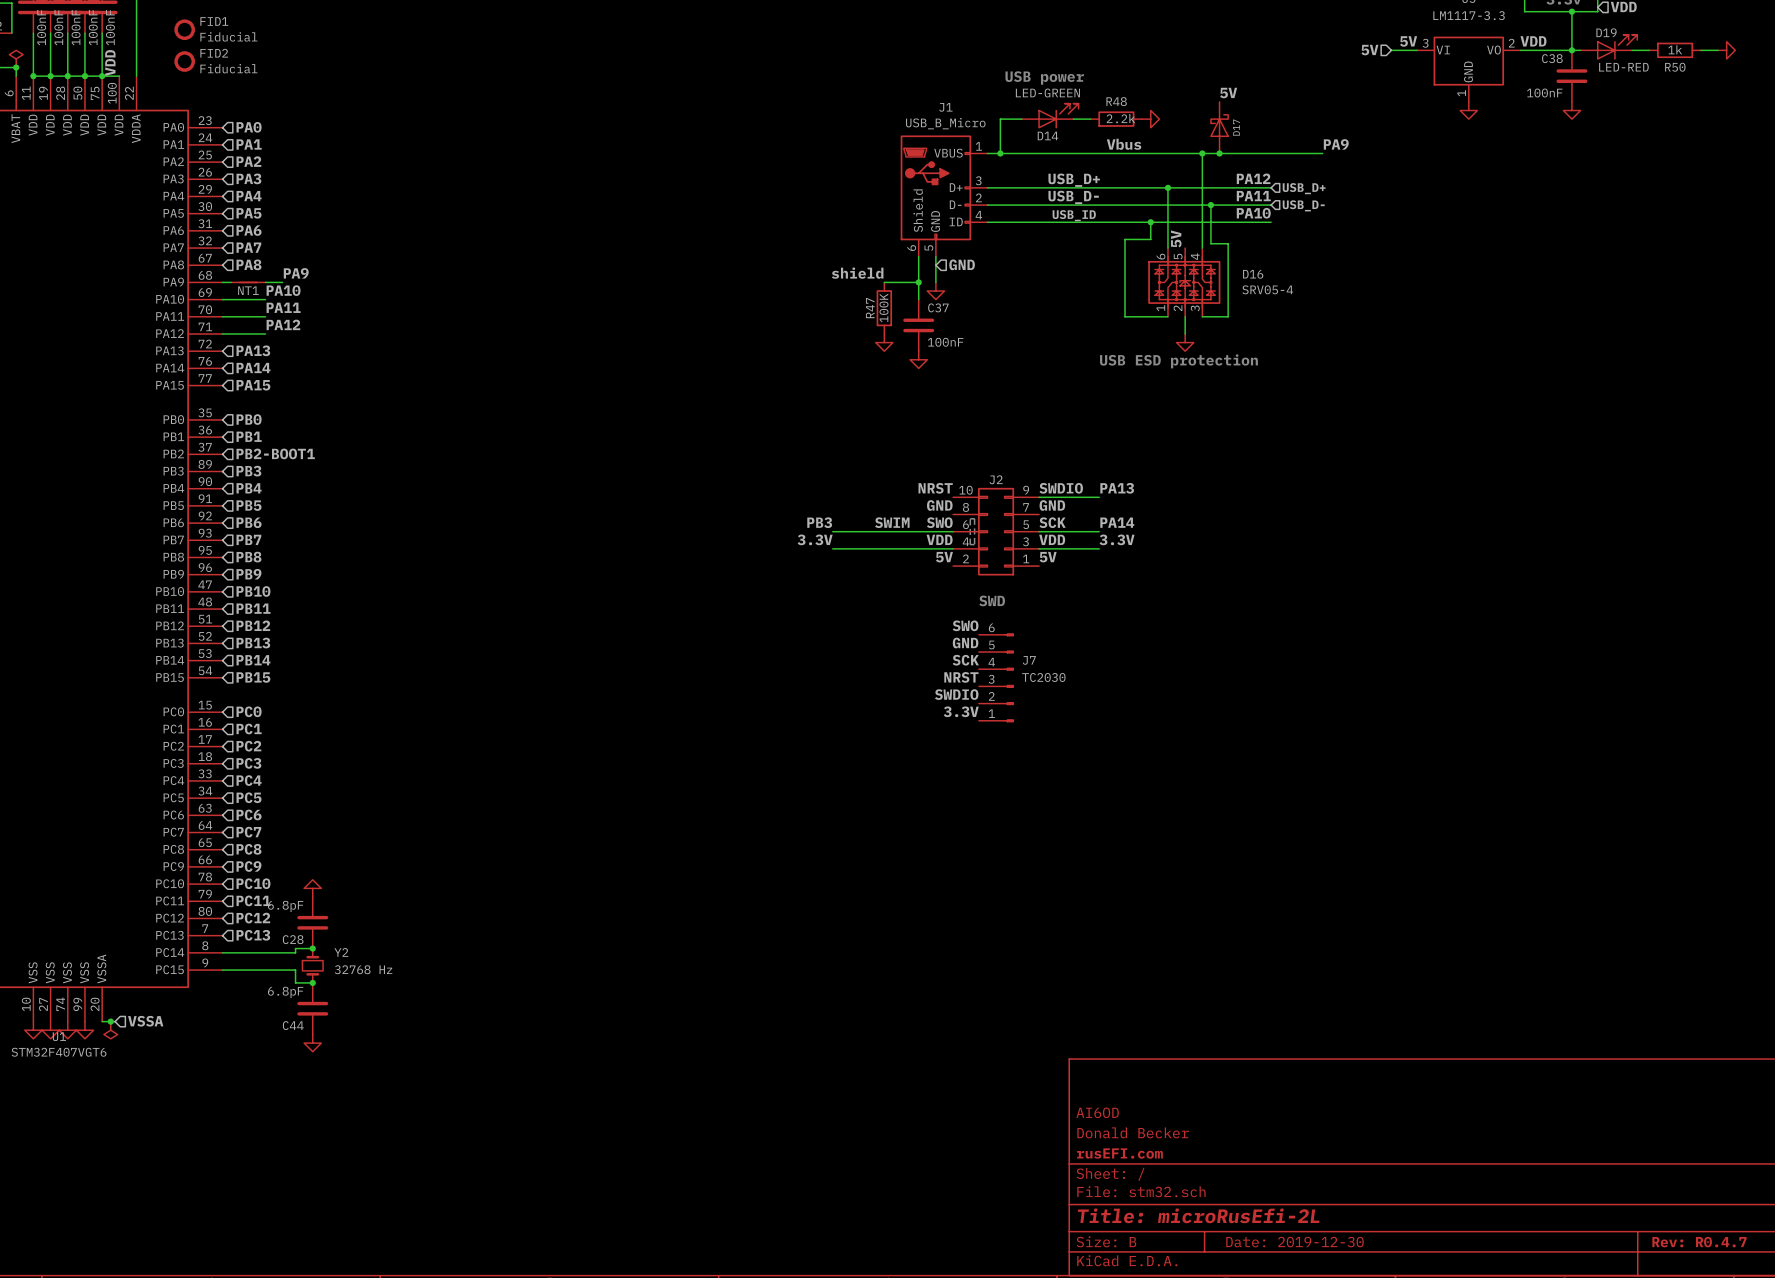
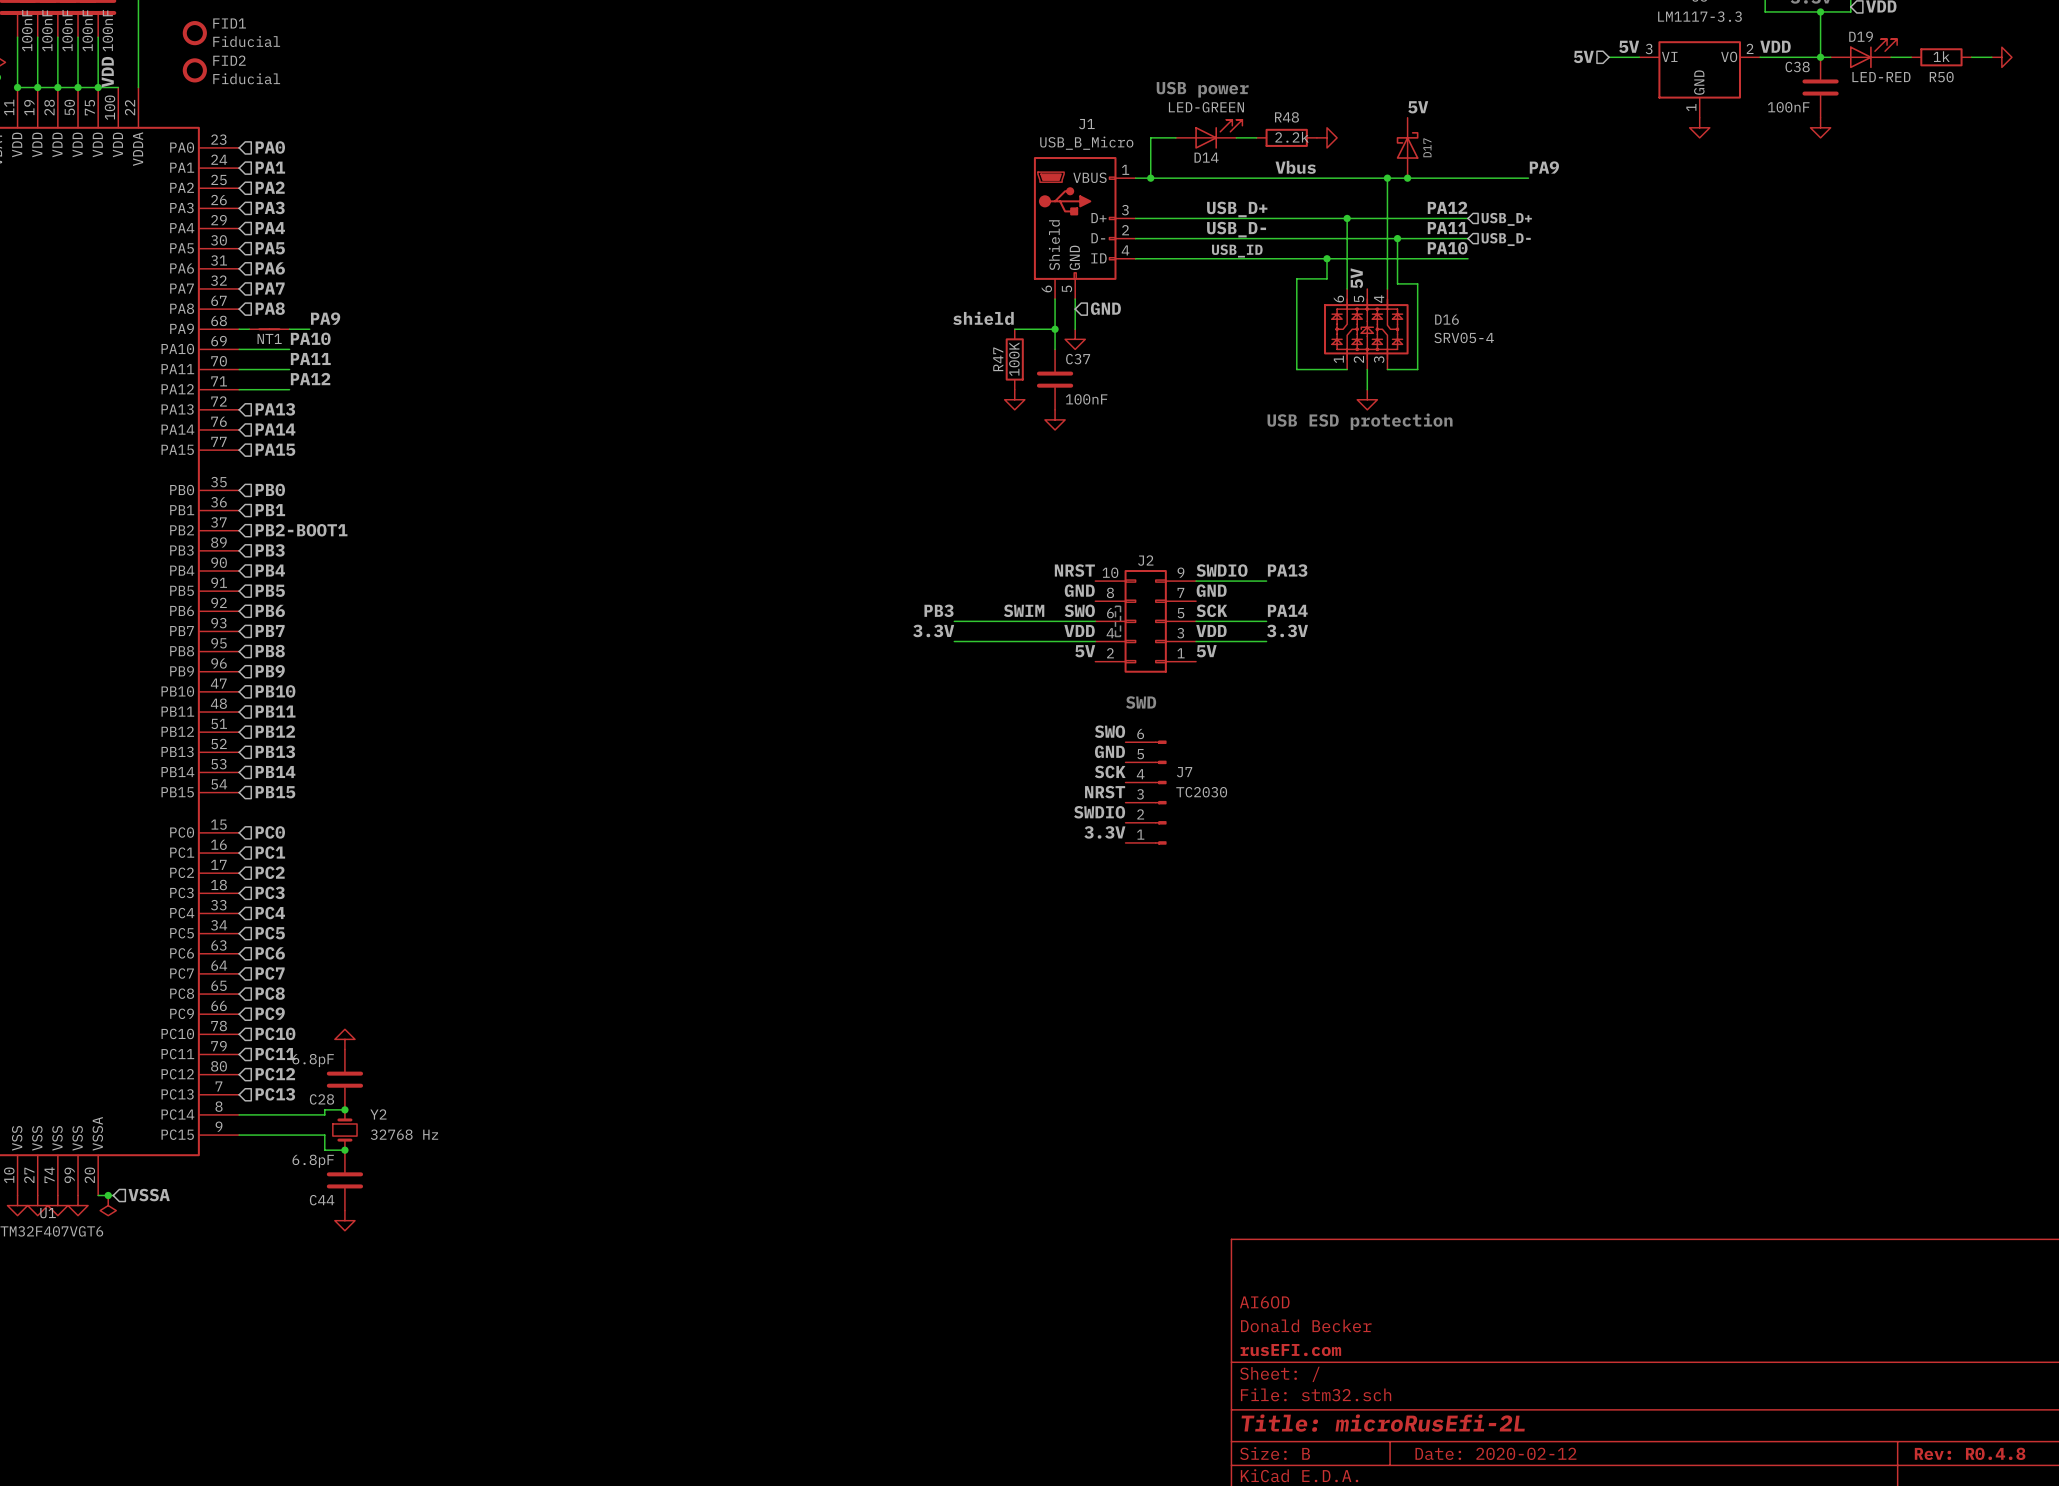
title block: Date: 2019-12-30 (1294, 1242) -> Date: 2020-02-12 (1495, 1453)
title block: Rev: R0.4.7 (1699, 1242) -> Rev: R0.4.8 (1970, 1453)

